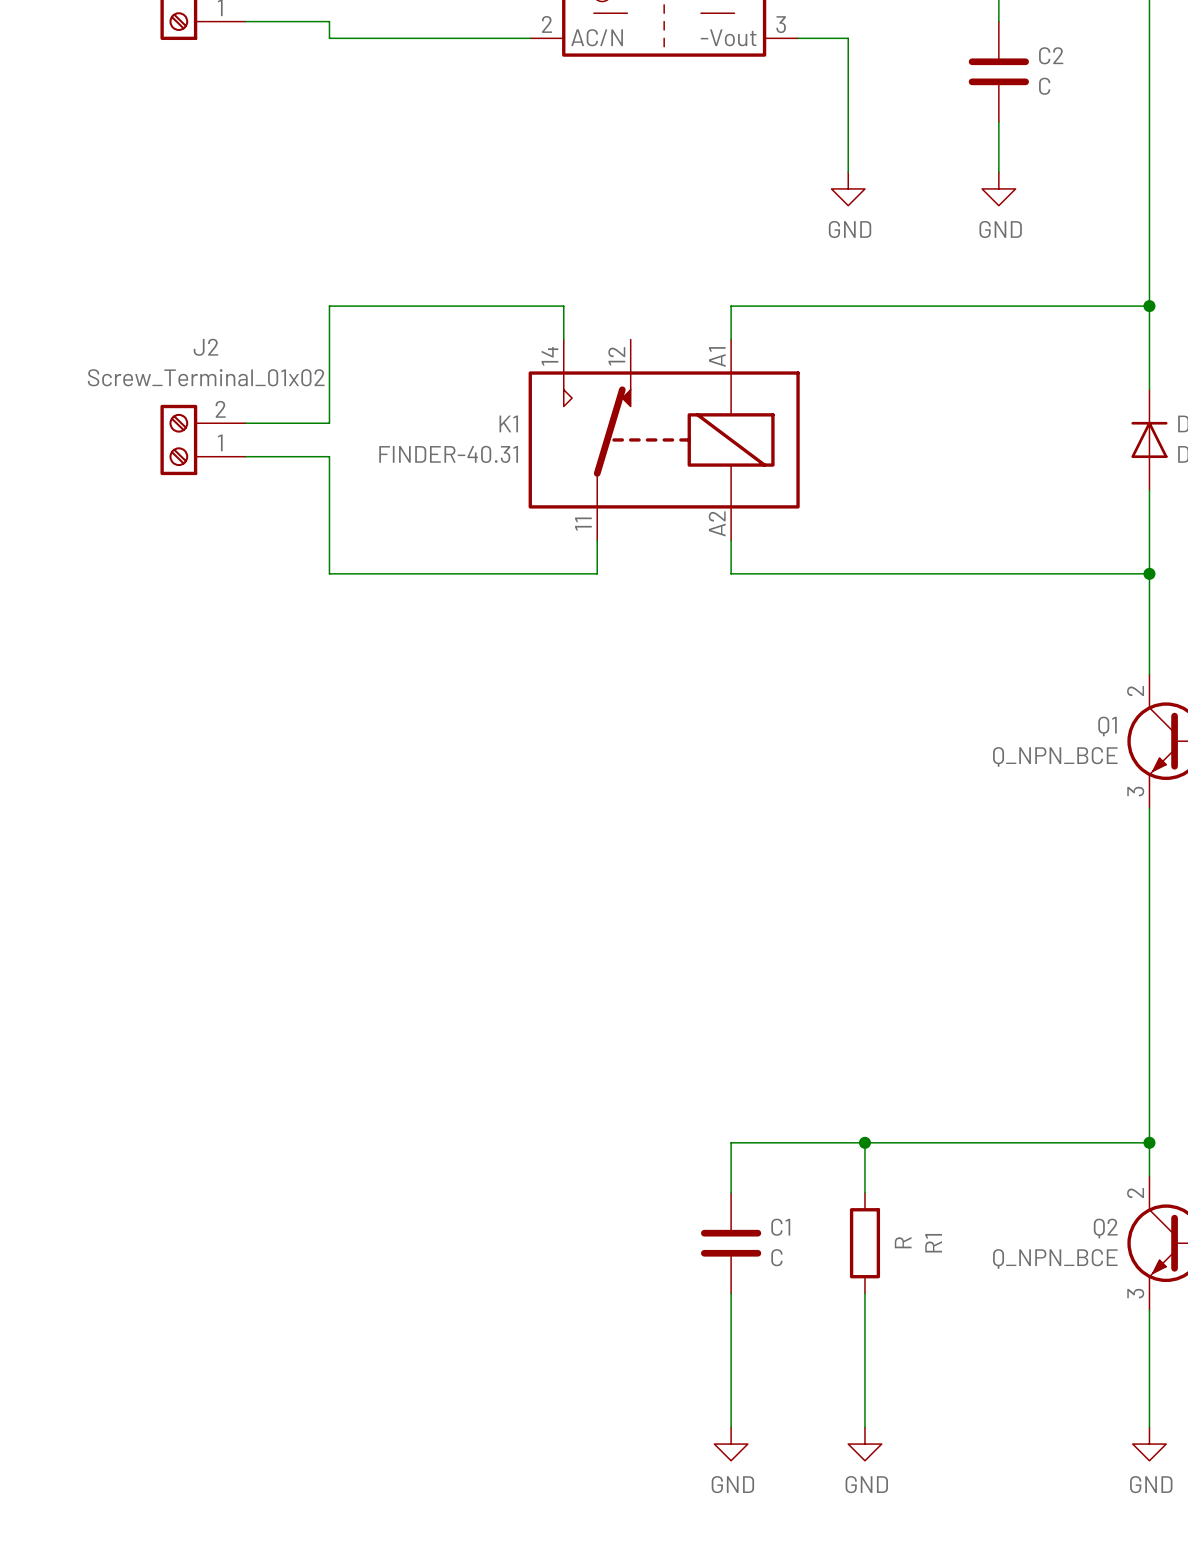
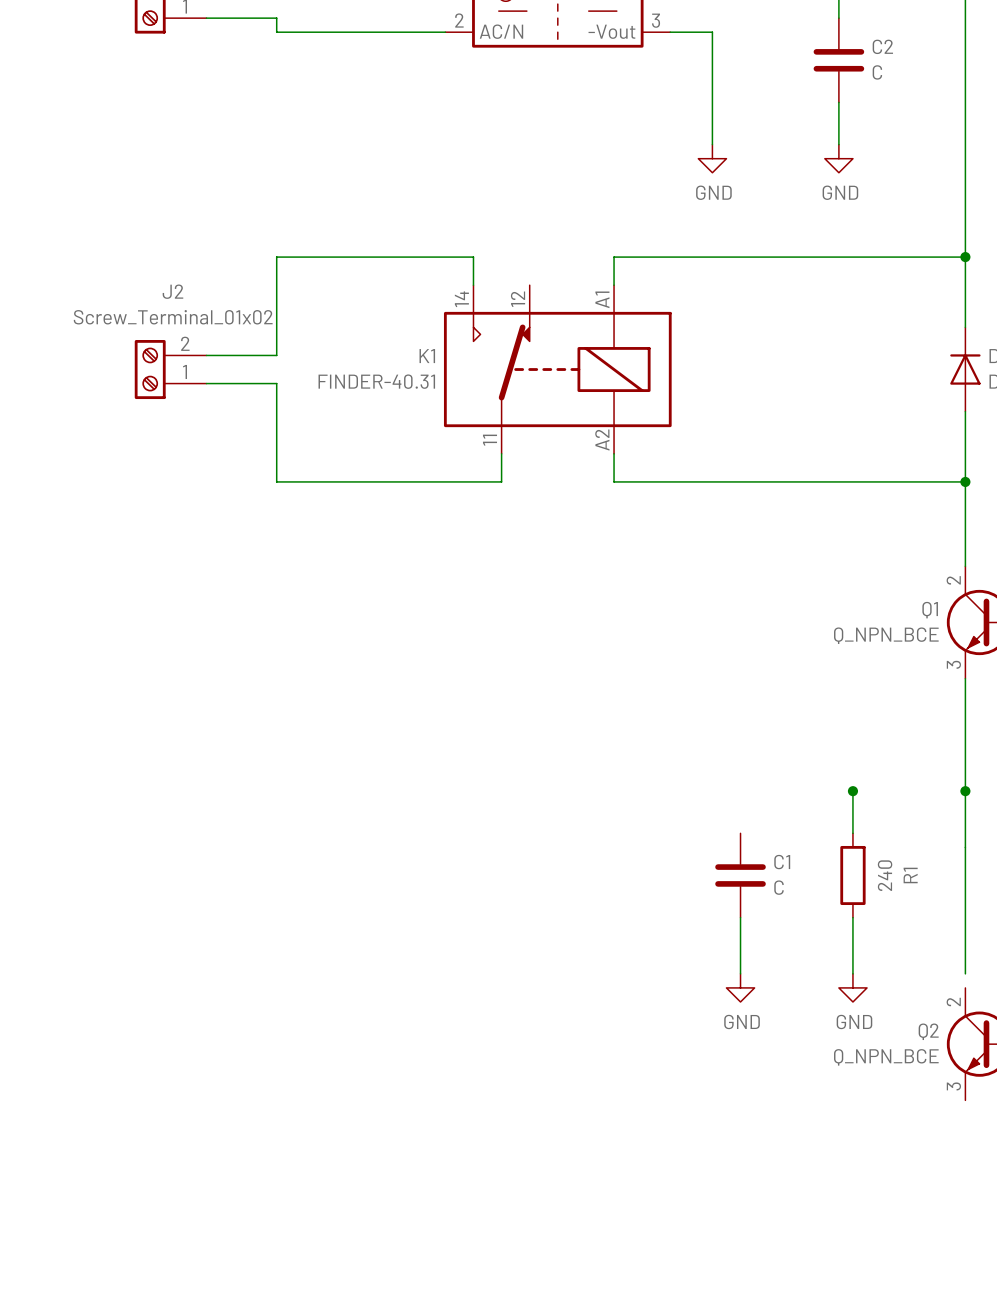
junction: none -> (852, 791)
junction: none -> (965, 791)
wire: none -> (740, 917) (740, 973)
wire: none -> (852, 917) (852, 973)
wire: (864, 1142) (864, 1193) -> (852, 791) (852, 833)
junction: (864, 1142) -> none
wire: (1149, 1142) (731, 1142) (731, 1193) -> none
junction: (1149, 1142) -> none
wire: (1149, 1159) (1149, 1176) -> none
power symbol: none -> GND (740, 987)
power symbol: none -> GND (852, 987)
R1 value: R (903, 1242) -> 240 (885, 875)
C1 position: (731, 1243) -> (740, 875)
R1 position: (864, 1243) -> (852, 875)
wire: (731, 1293) (731, 1427) -> none
wire: (864, 1293) (864, 1427) -> none
wire: (1149, 1310) (1149, 1427) -> none
power symbol: GND (731, 1444) -> none
power symbol: GND (864, 1444) -> none
power symbol: GND (1149, 1444) -> none

